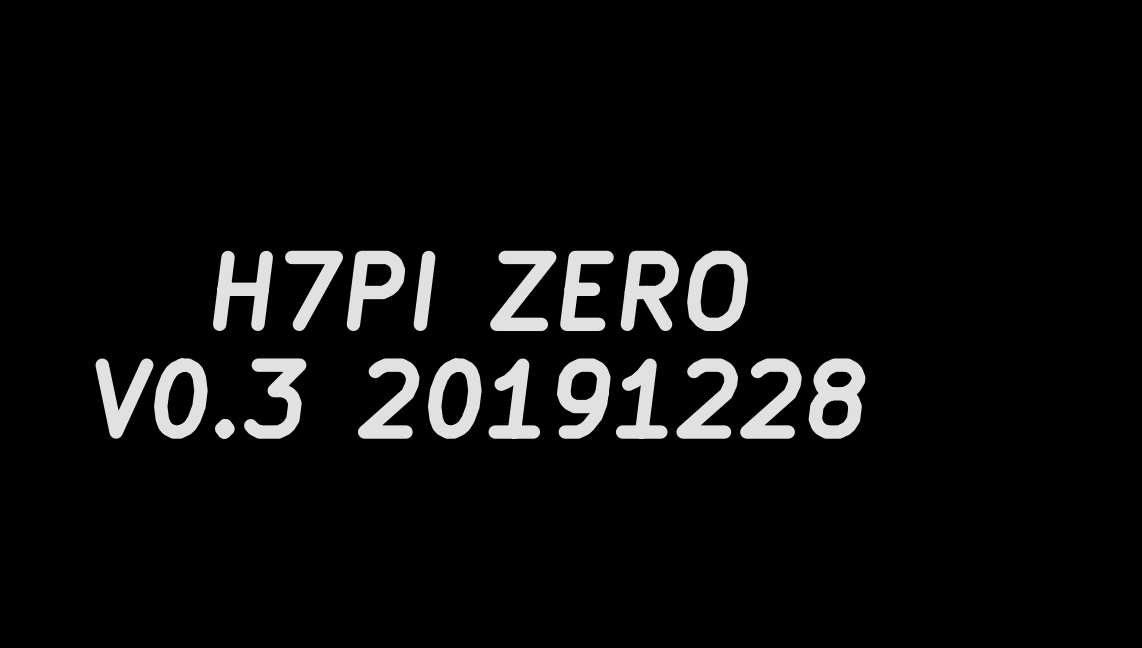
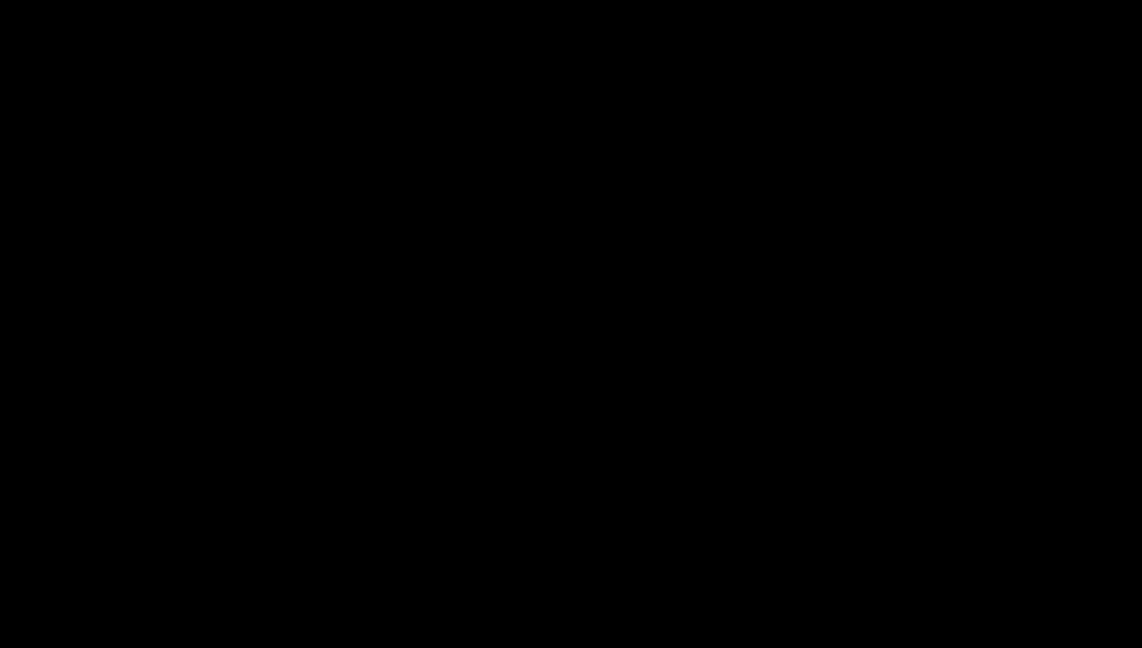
text: H7PI ZERO (480, 290) -> none
text: V0.3 20191228 (480, 398) -> none

